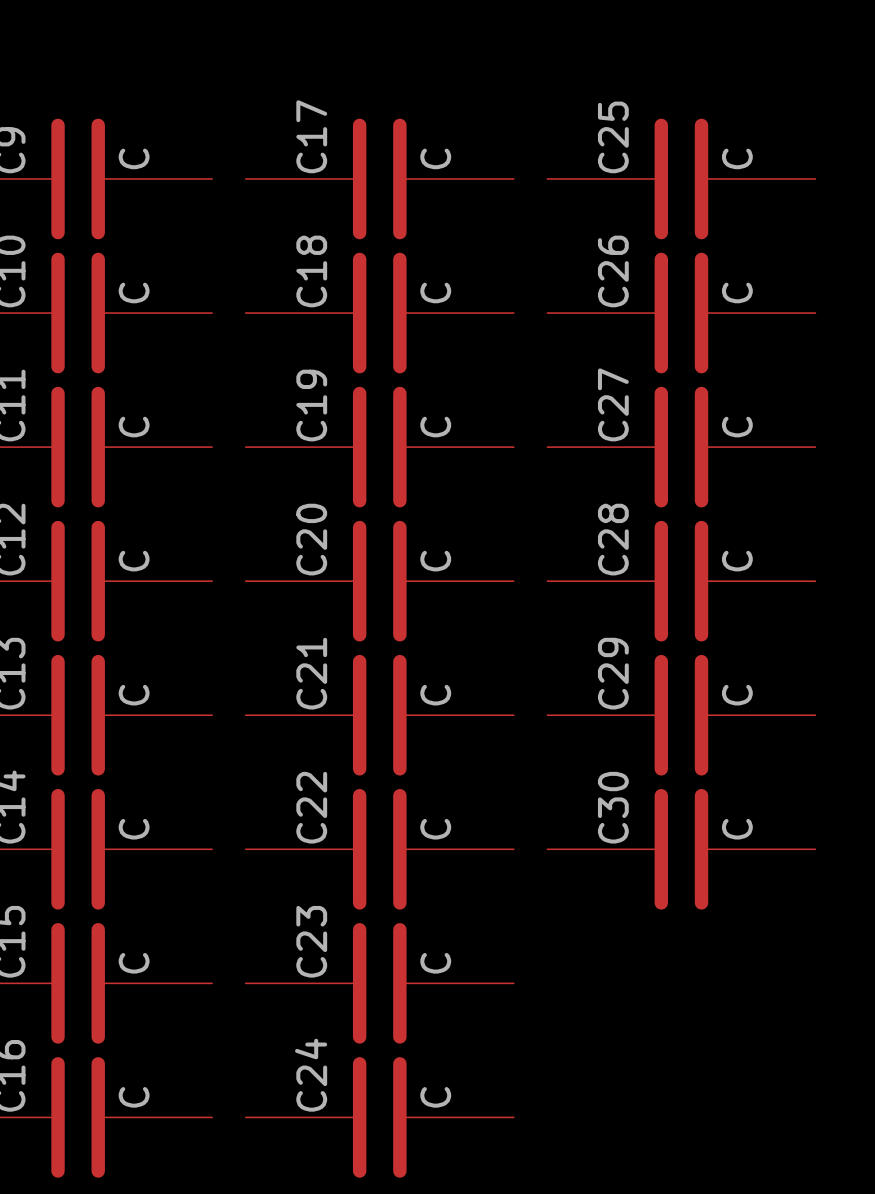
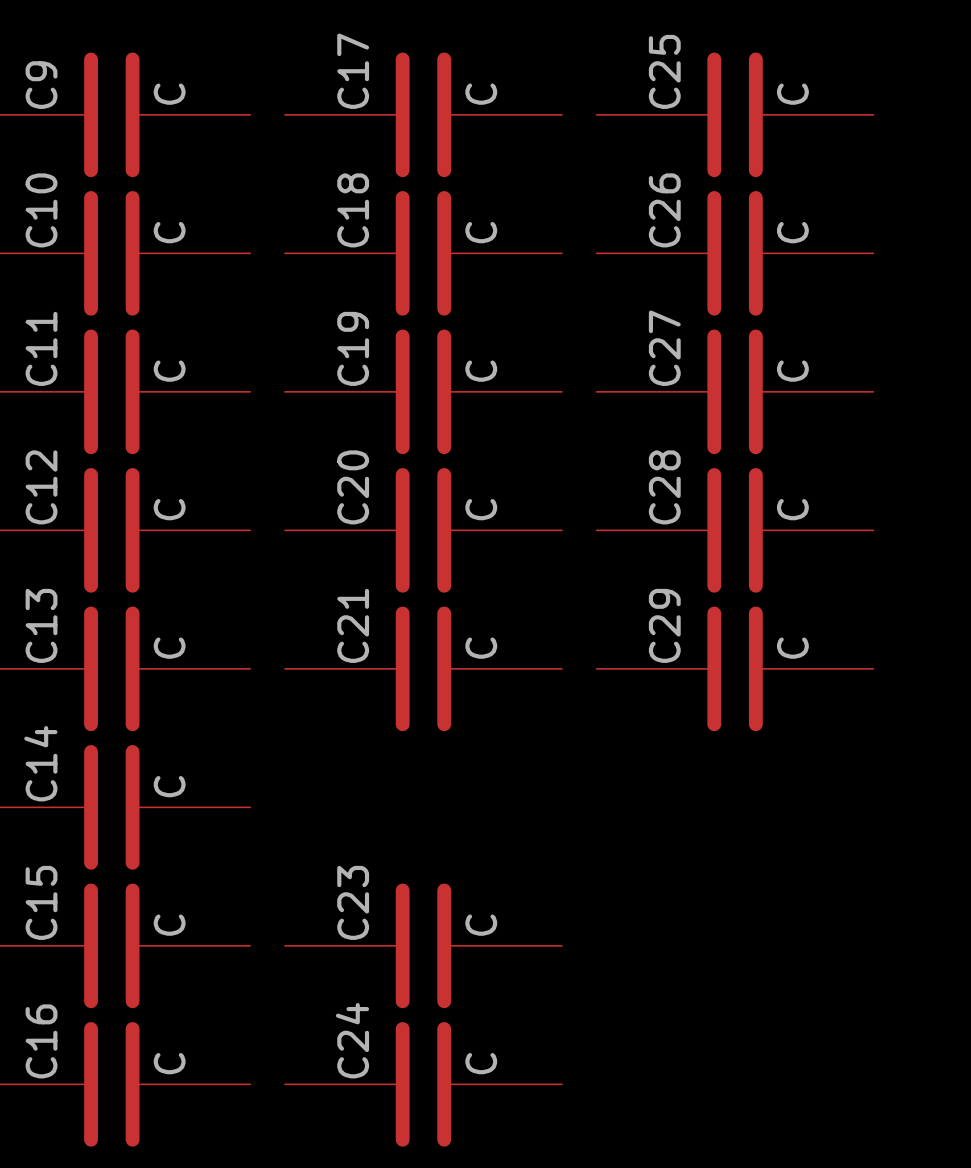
C22: C (379, 849) -> none
C30: C (681, 849) -> none

